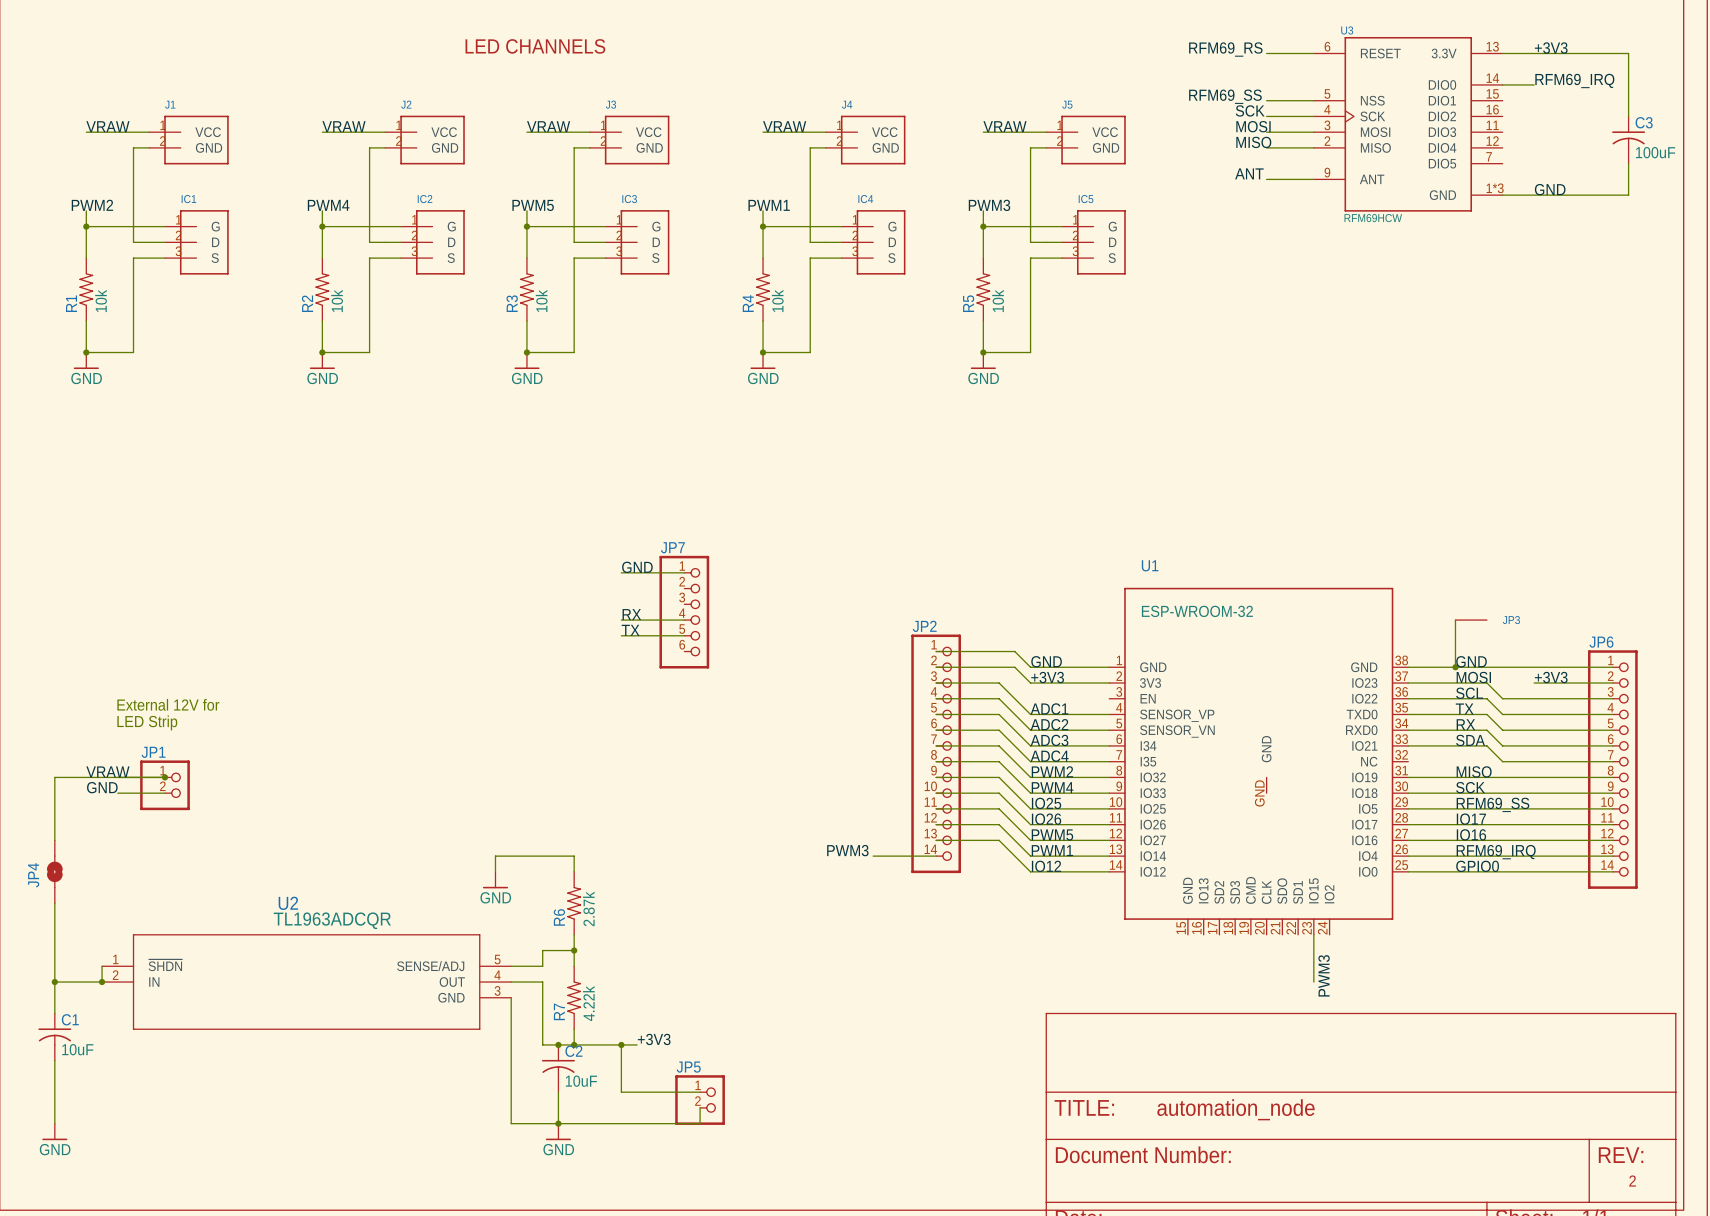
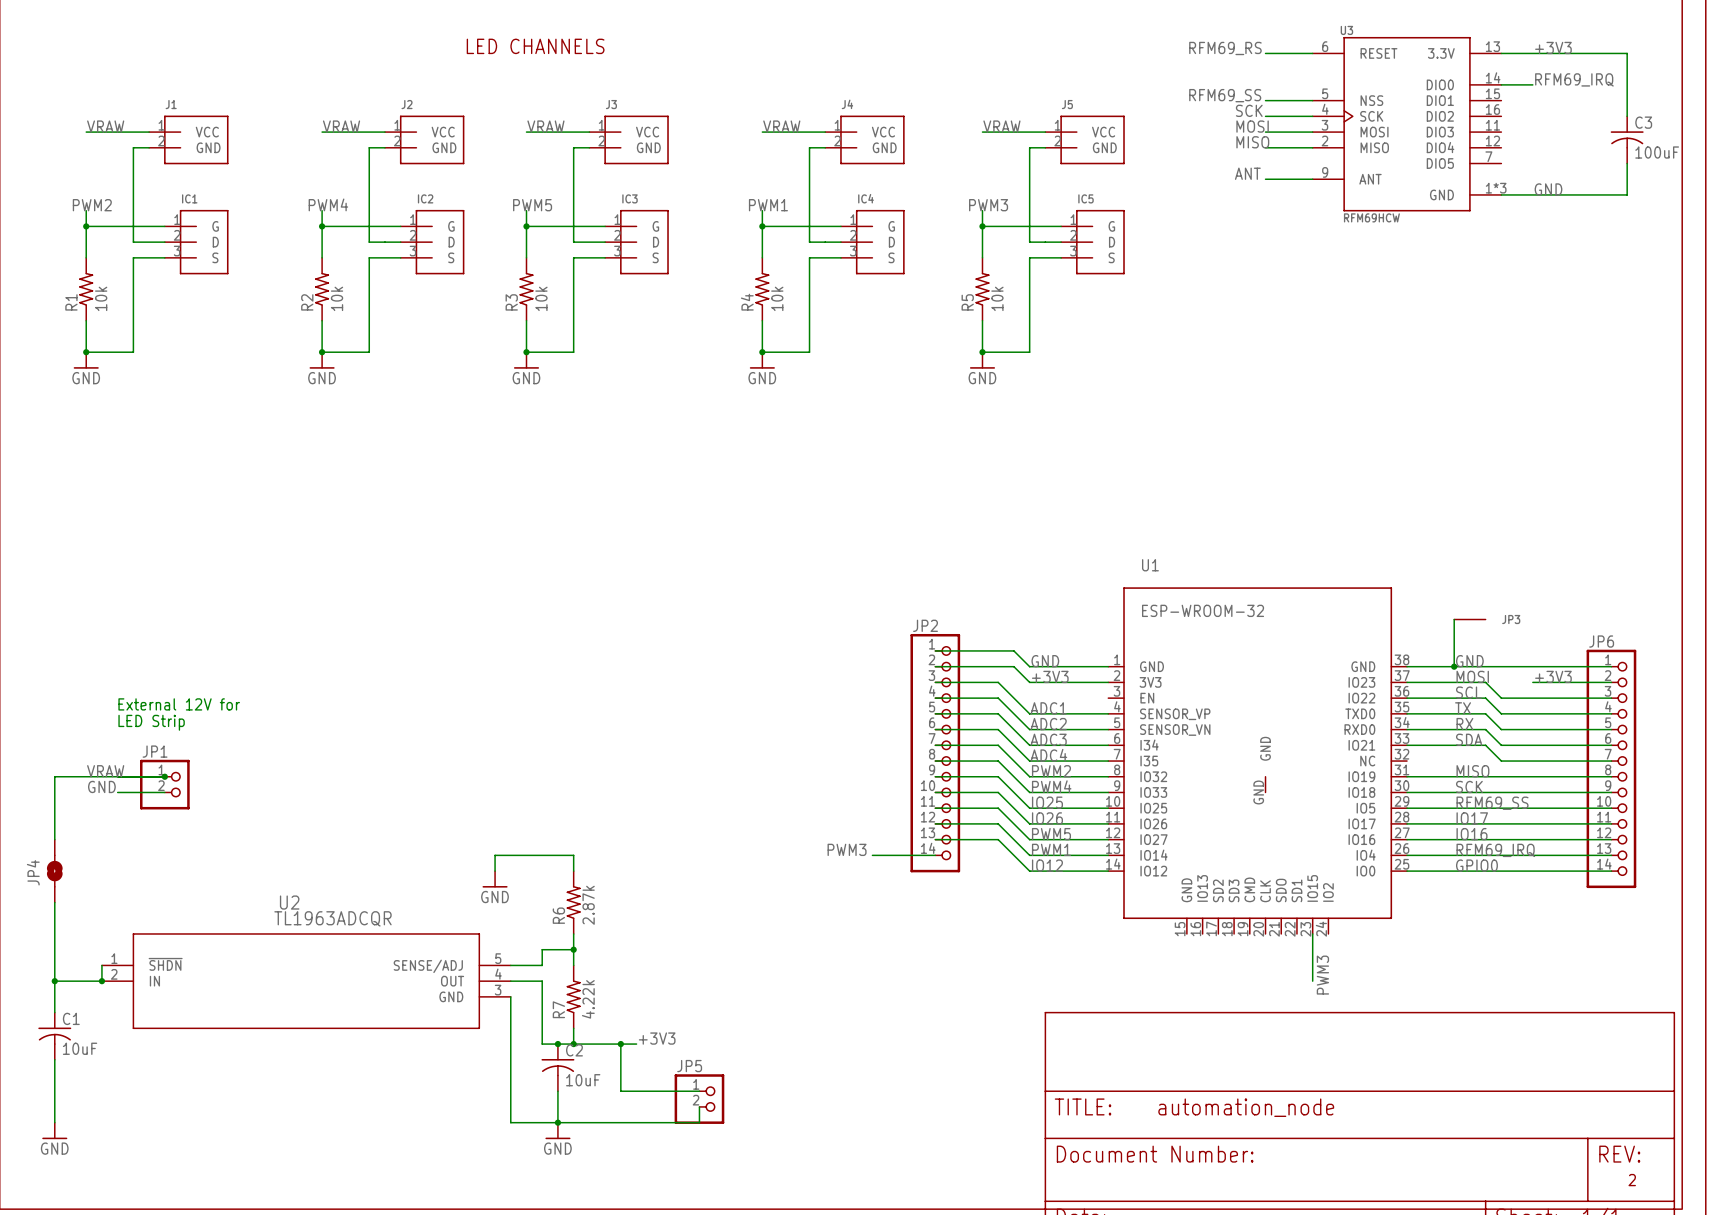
label: GND (637, 567) -> none
wire: (621, 572) (684, 572) -> none
JP7: (684, 612) -> none
label: RX (631, 614) -> none
wire: (621, 620) (684, 620) -> none
label: TX (630, 630) -> none
wire: (621, 635) (684, 635) -> none

